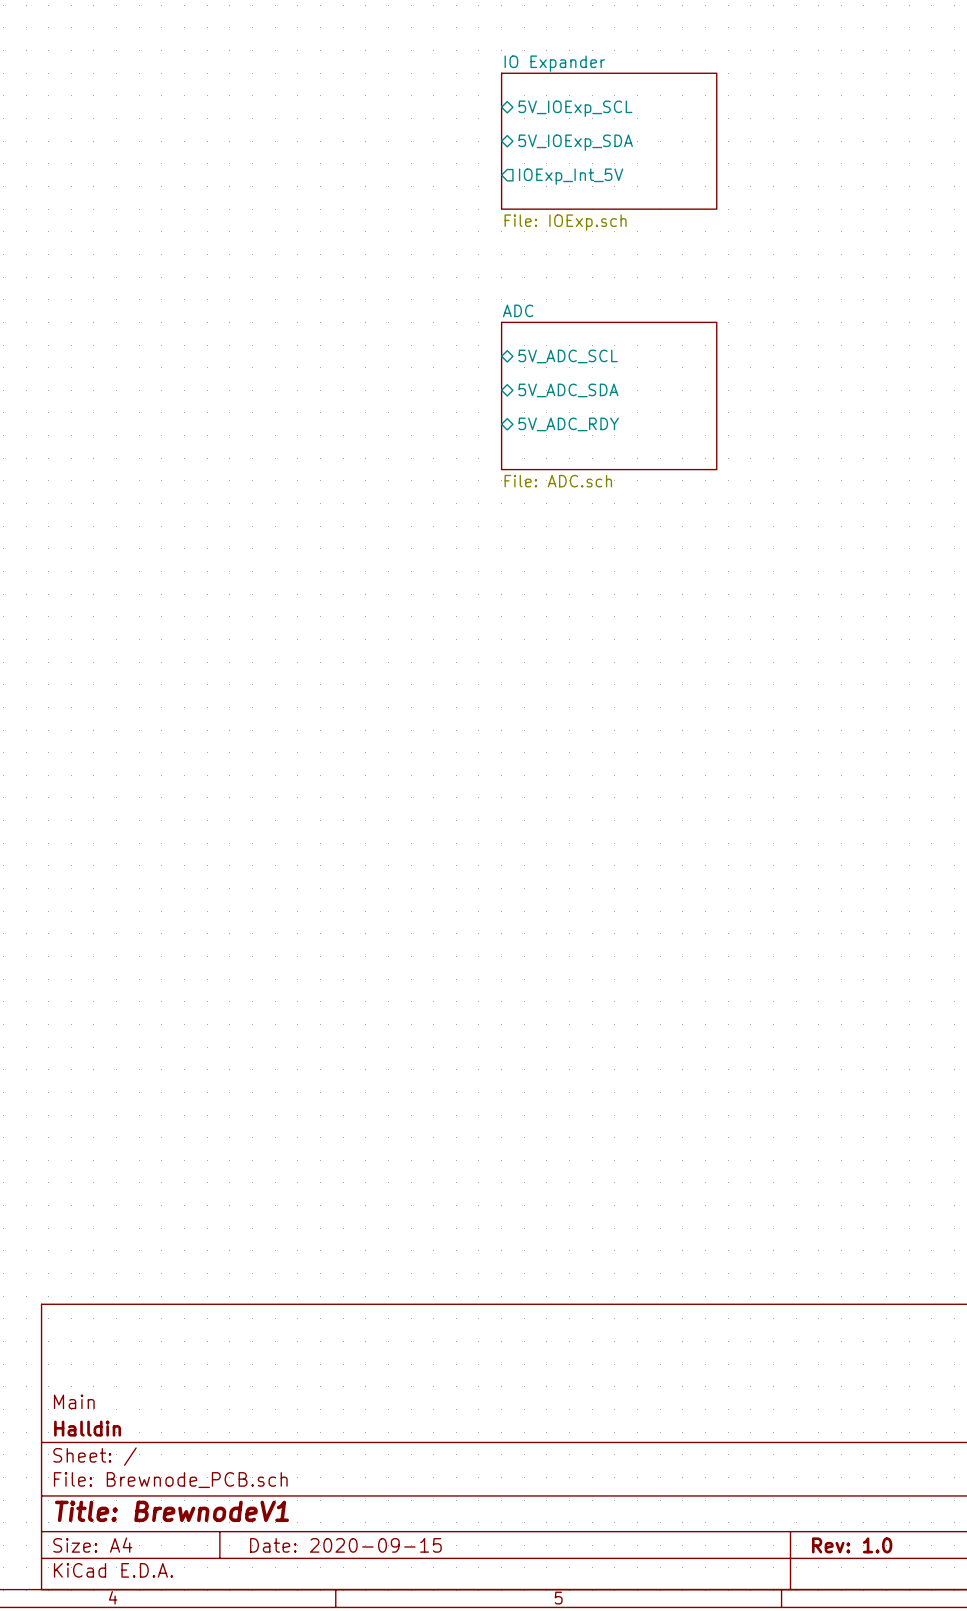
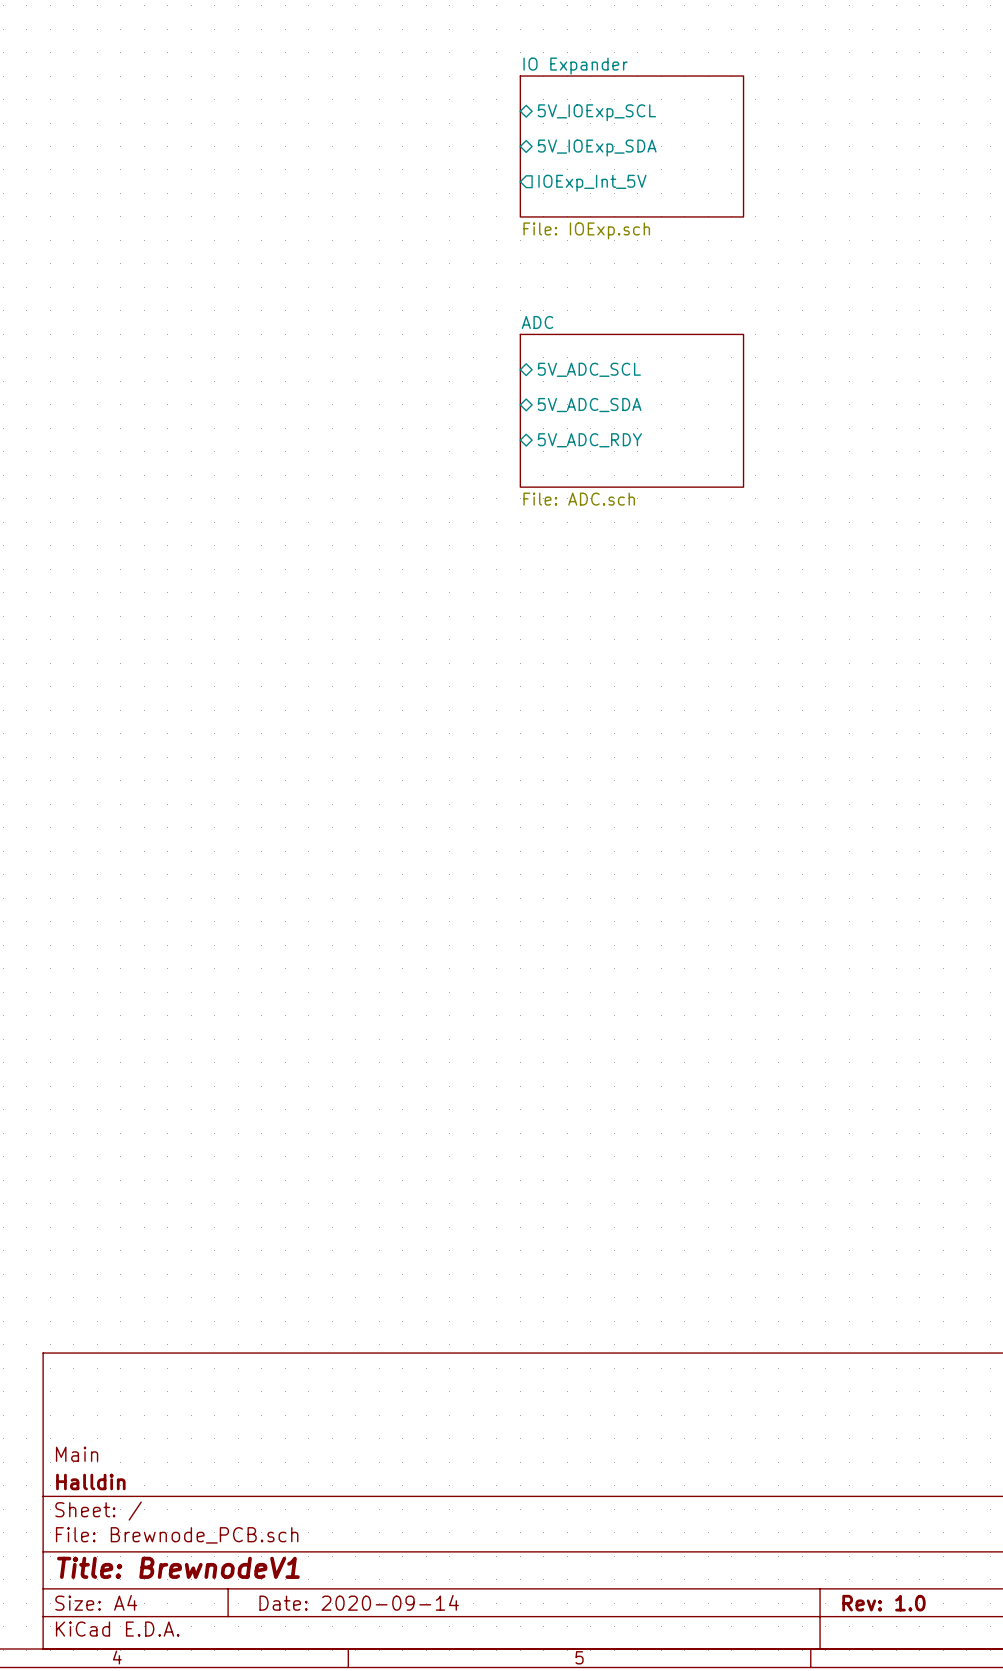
title block: Date: 2020-09-15 (345, 1545) -> Date: 2020-09-14 (359, 1602)

